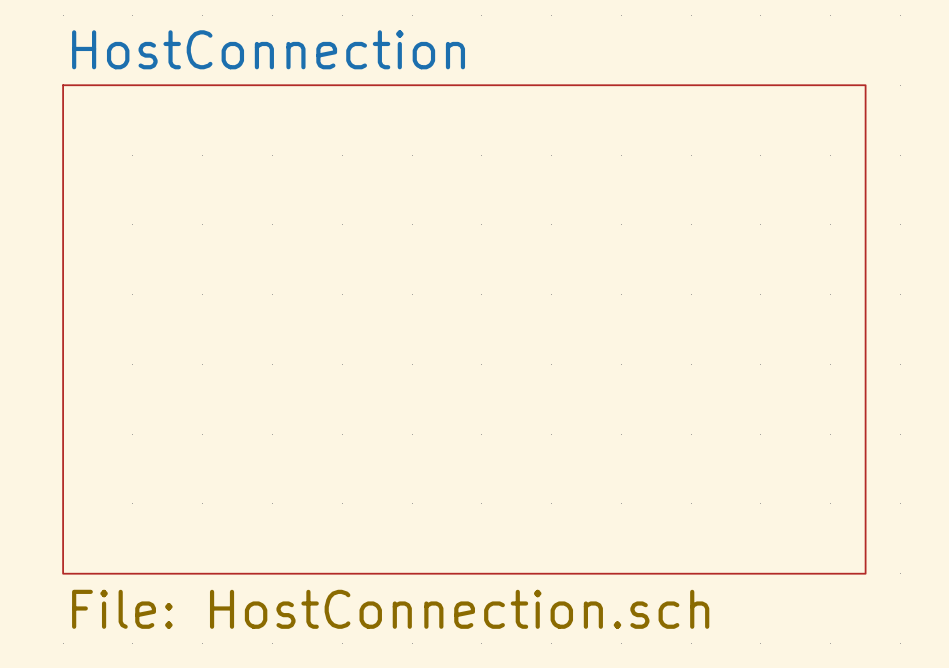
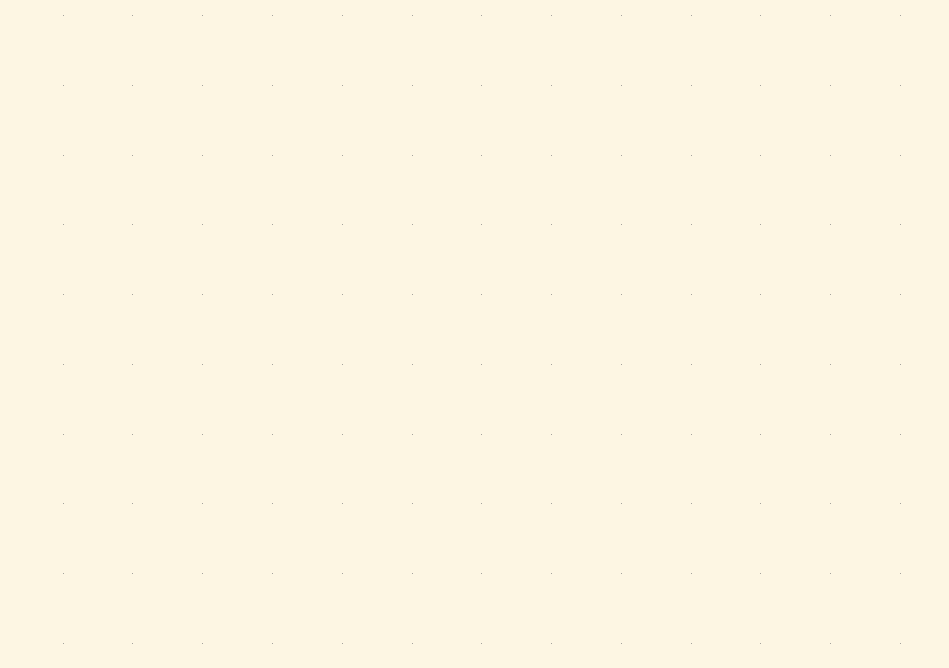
sheet HostConnection: File: HostConnection.sch (464, 329) -> none

